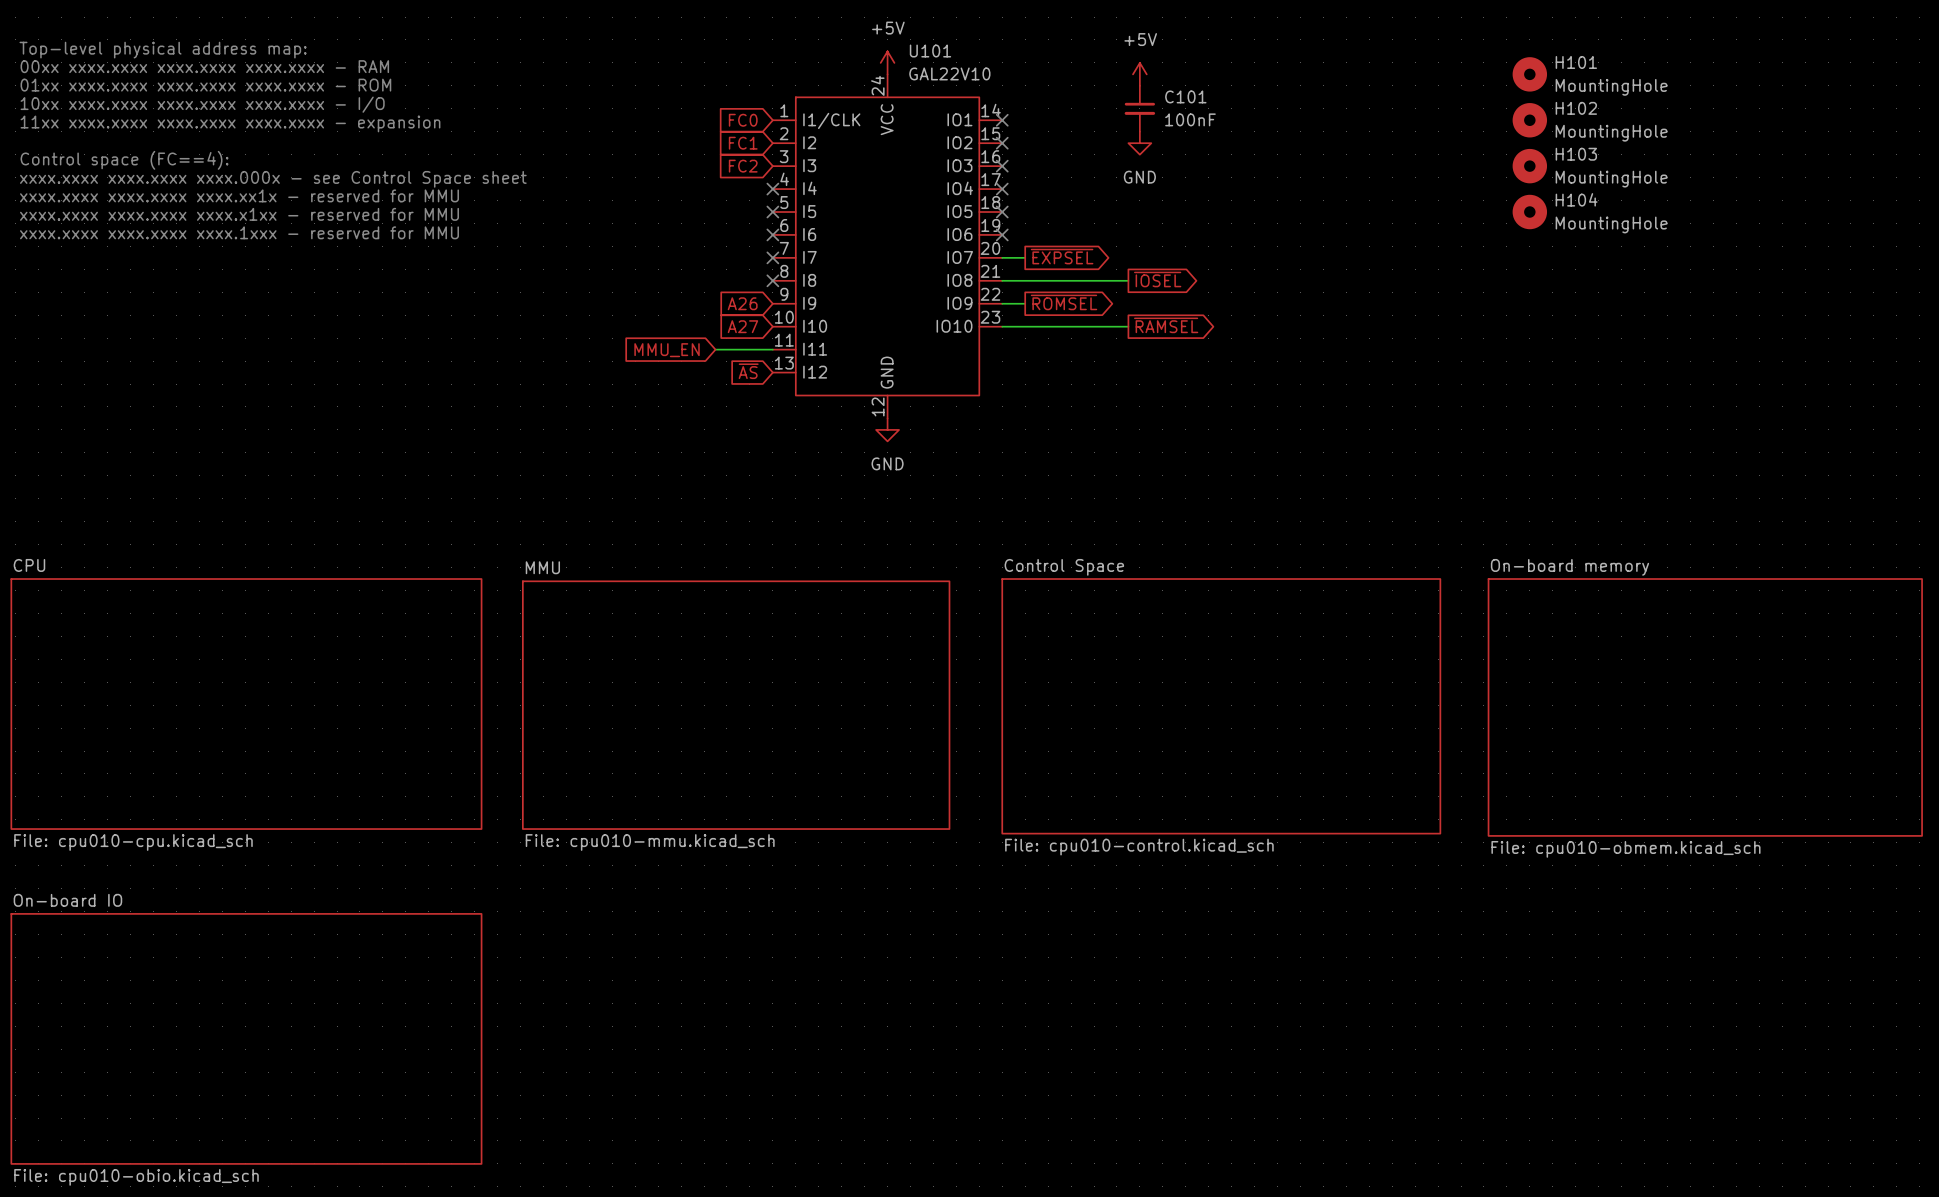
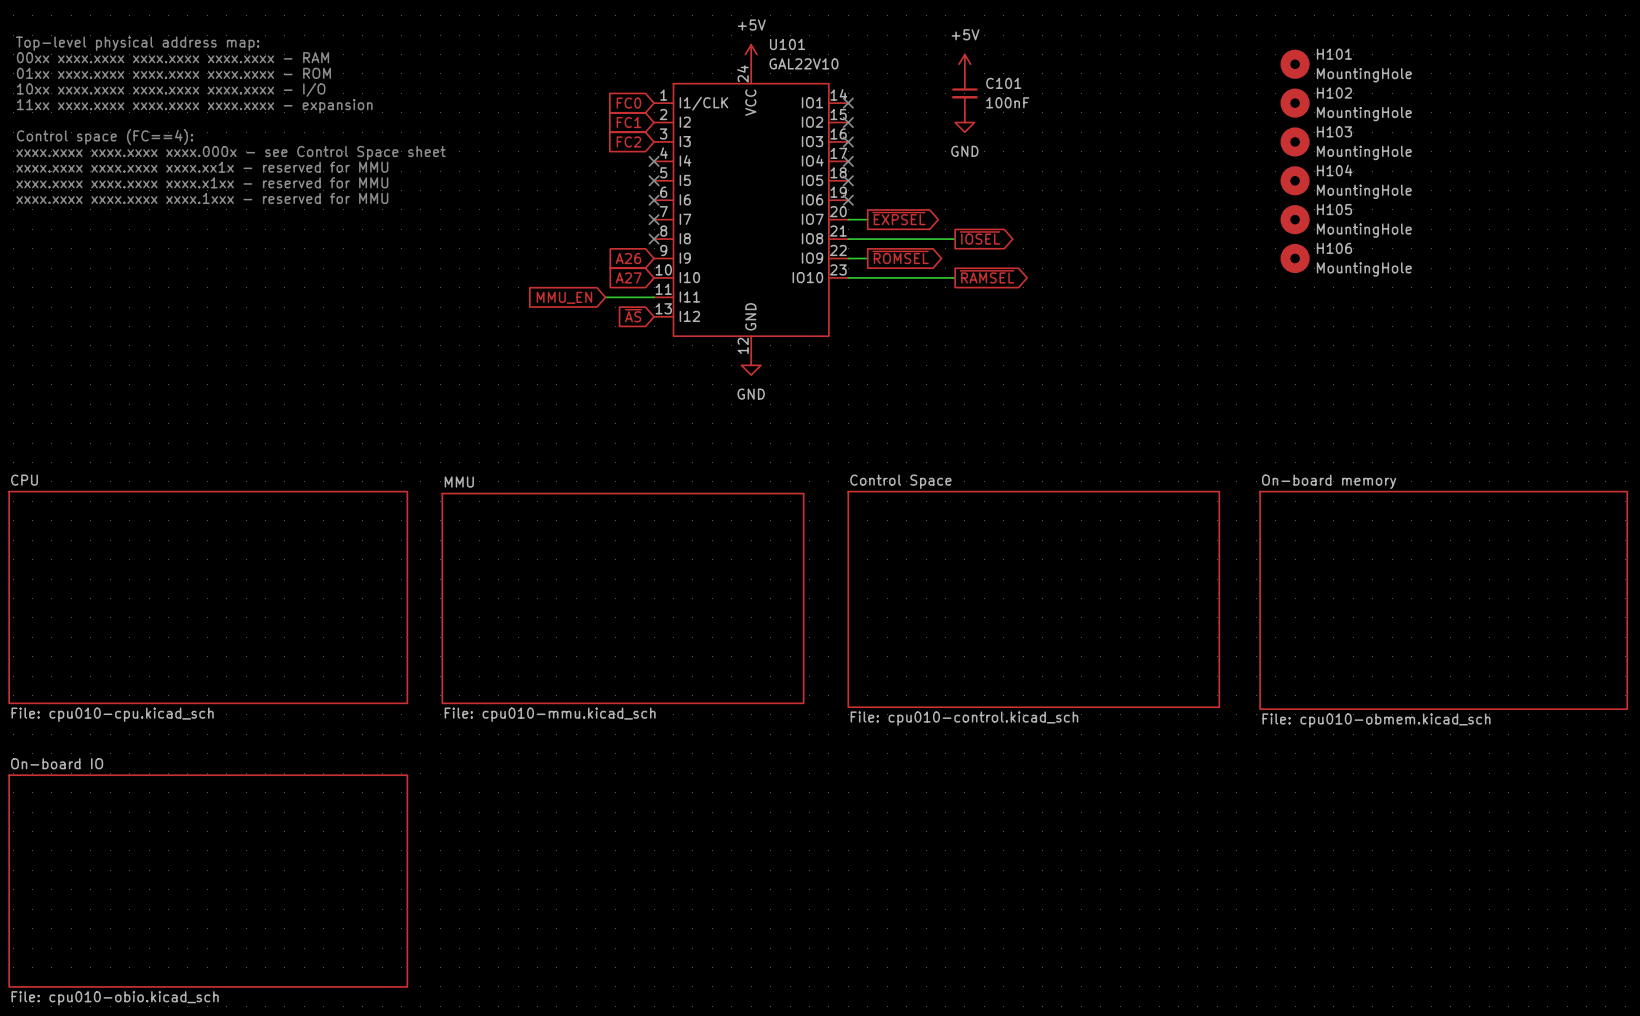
H105: none -> MountingHole (1295, 219)
H106: none -> MountingHole (1295, 258)

